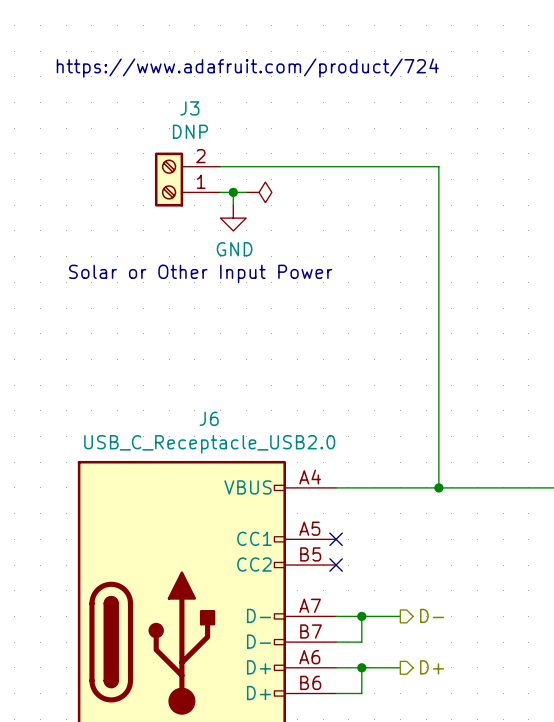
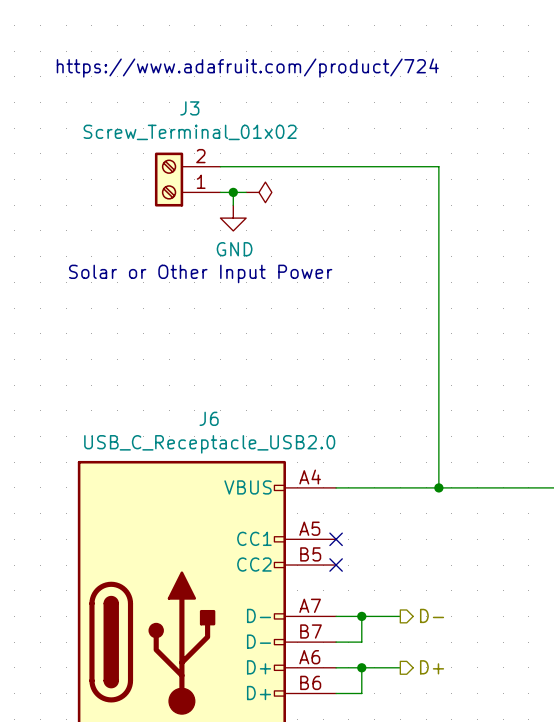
J3 value: DNP (190, 131) -> Screw_Terminal_01x02 (190, 132)

